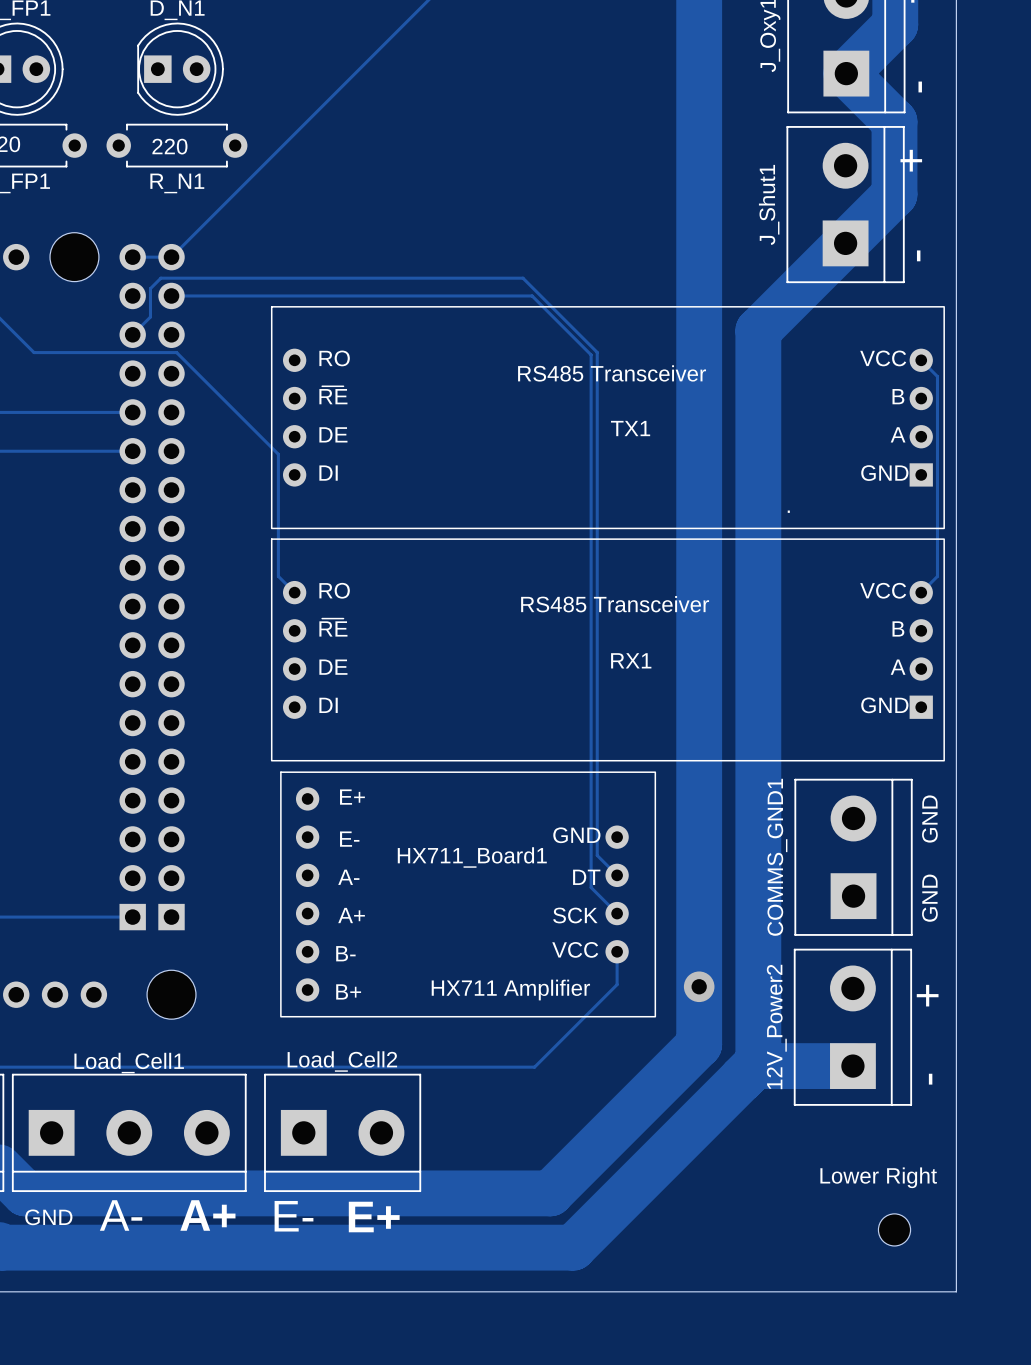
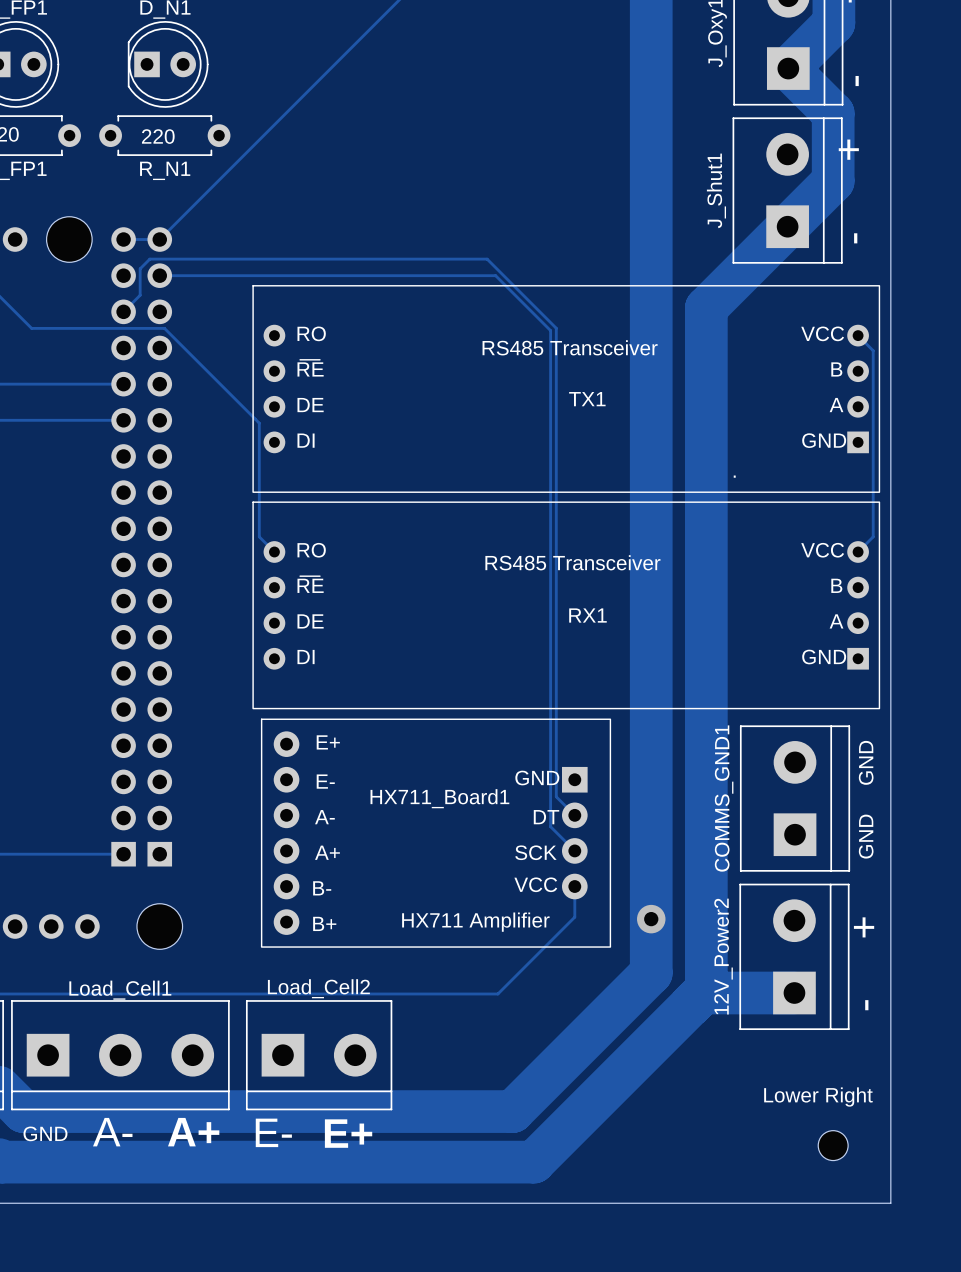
HX711_Board1 footprint: [280, 771, 657, 1018] -> [260, 718, 612, 948]

